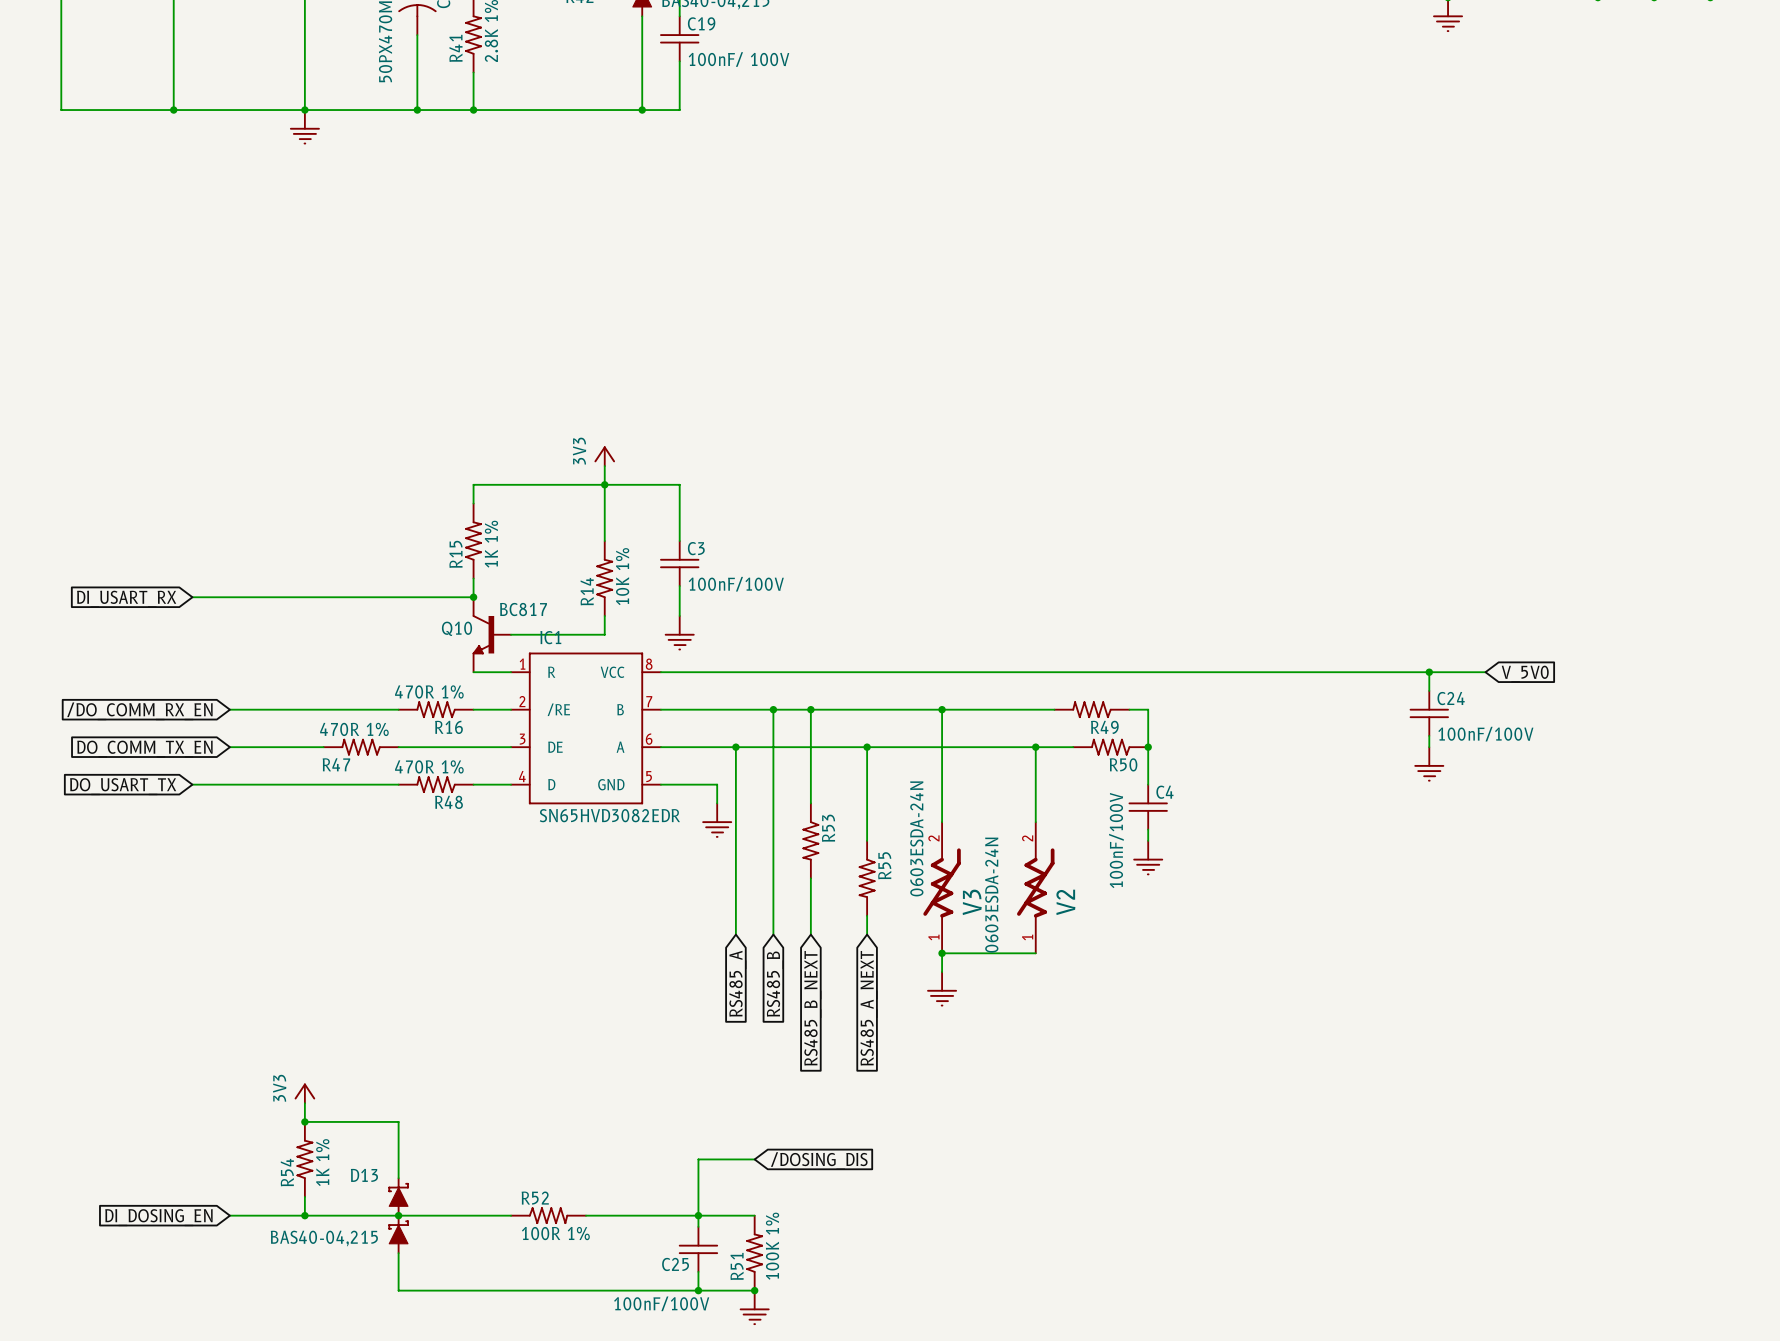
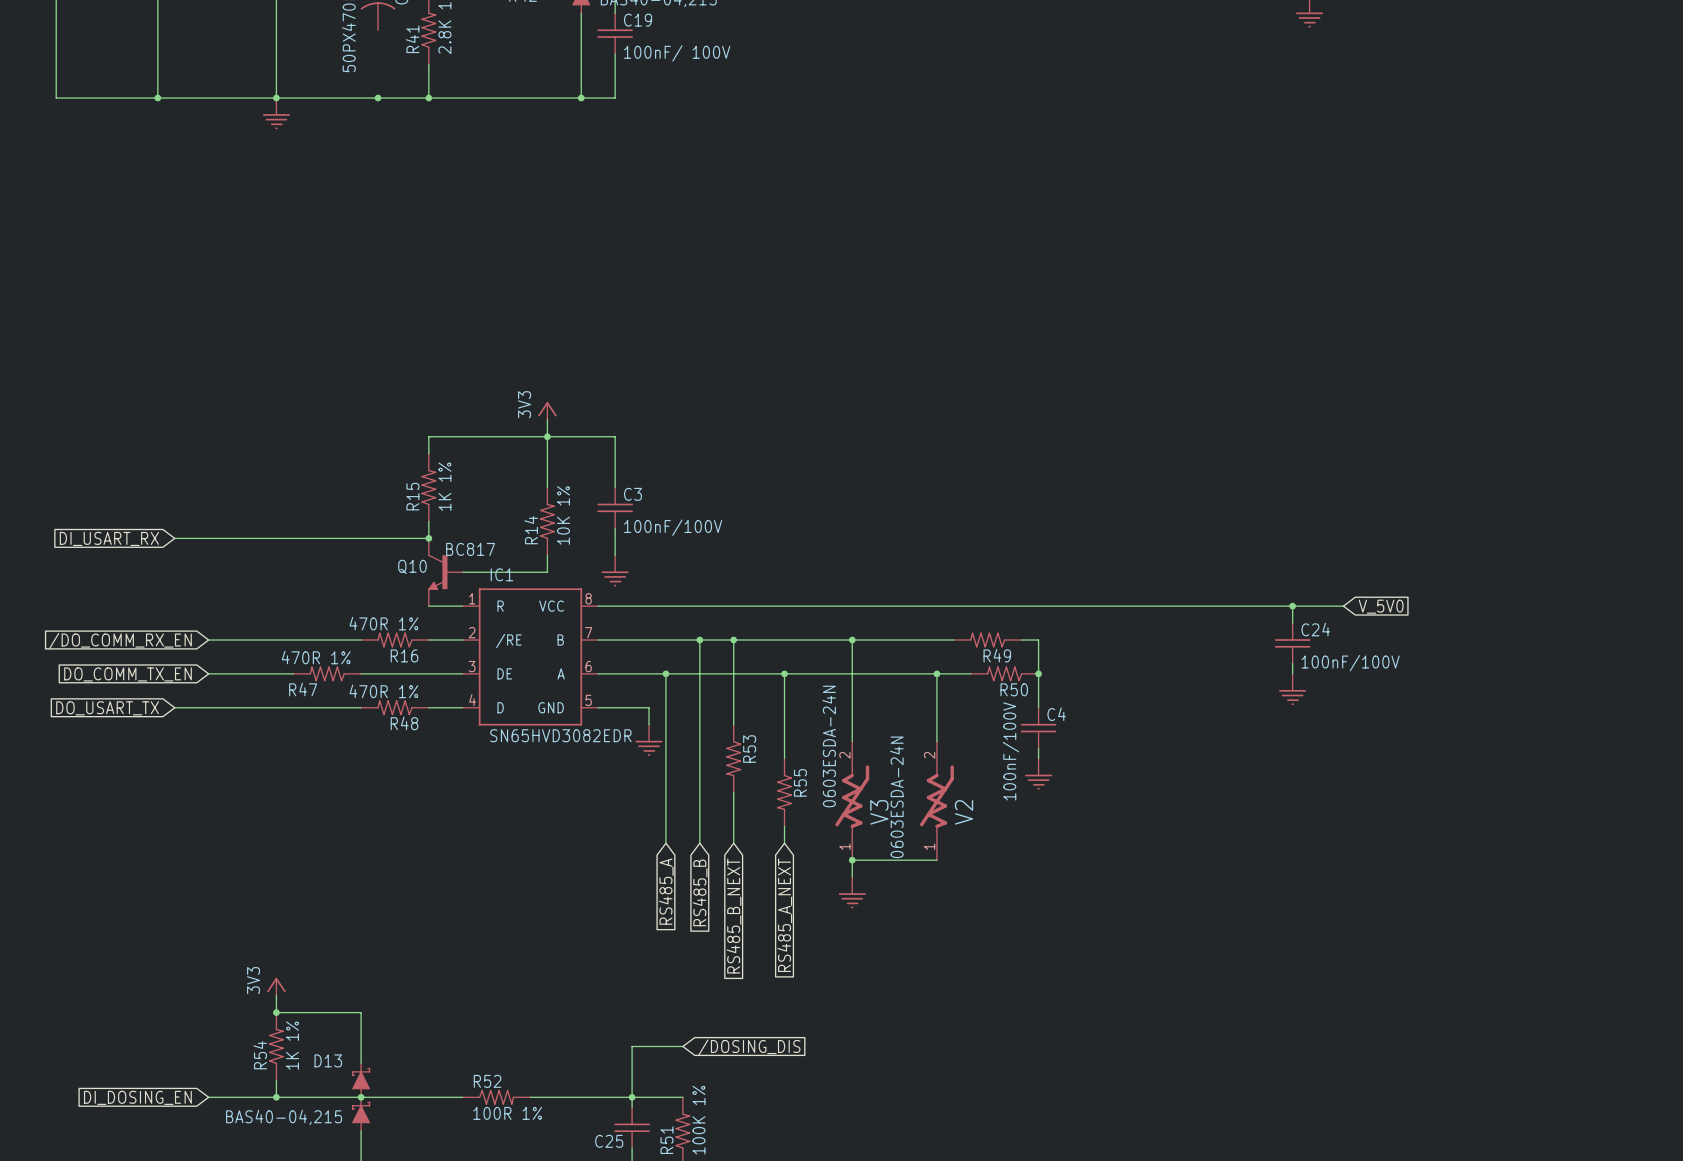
wire: (417, 35) (417, 110) -> none

